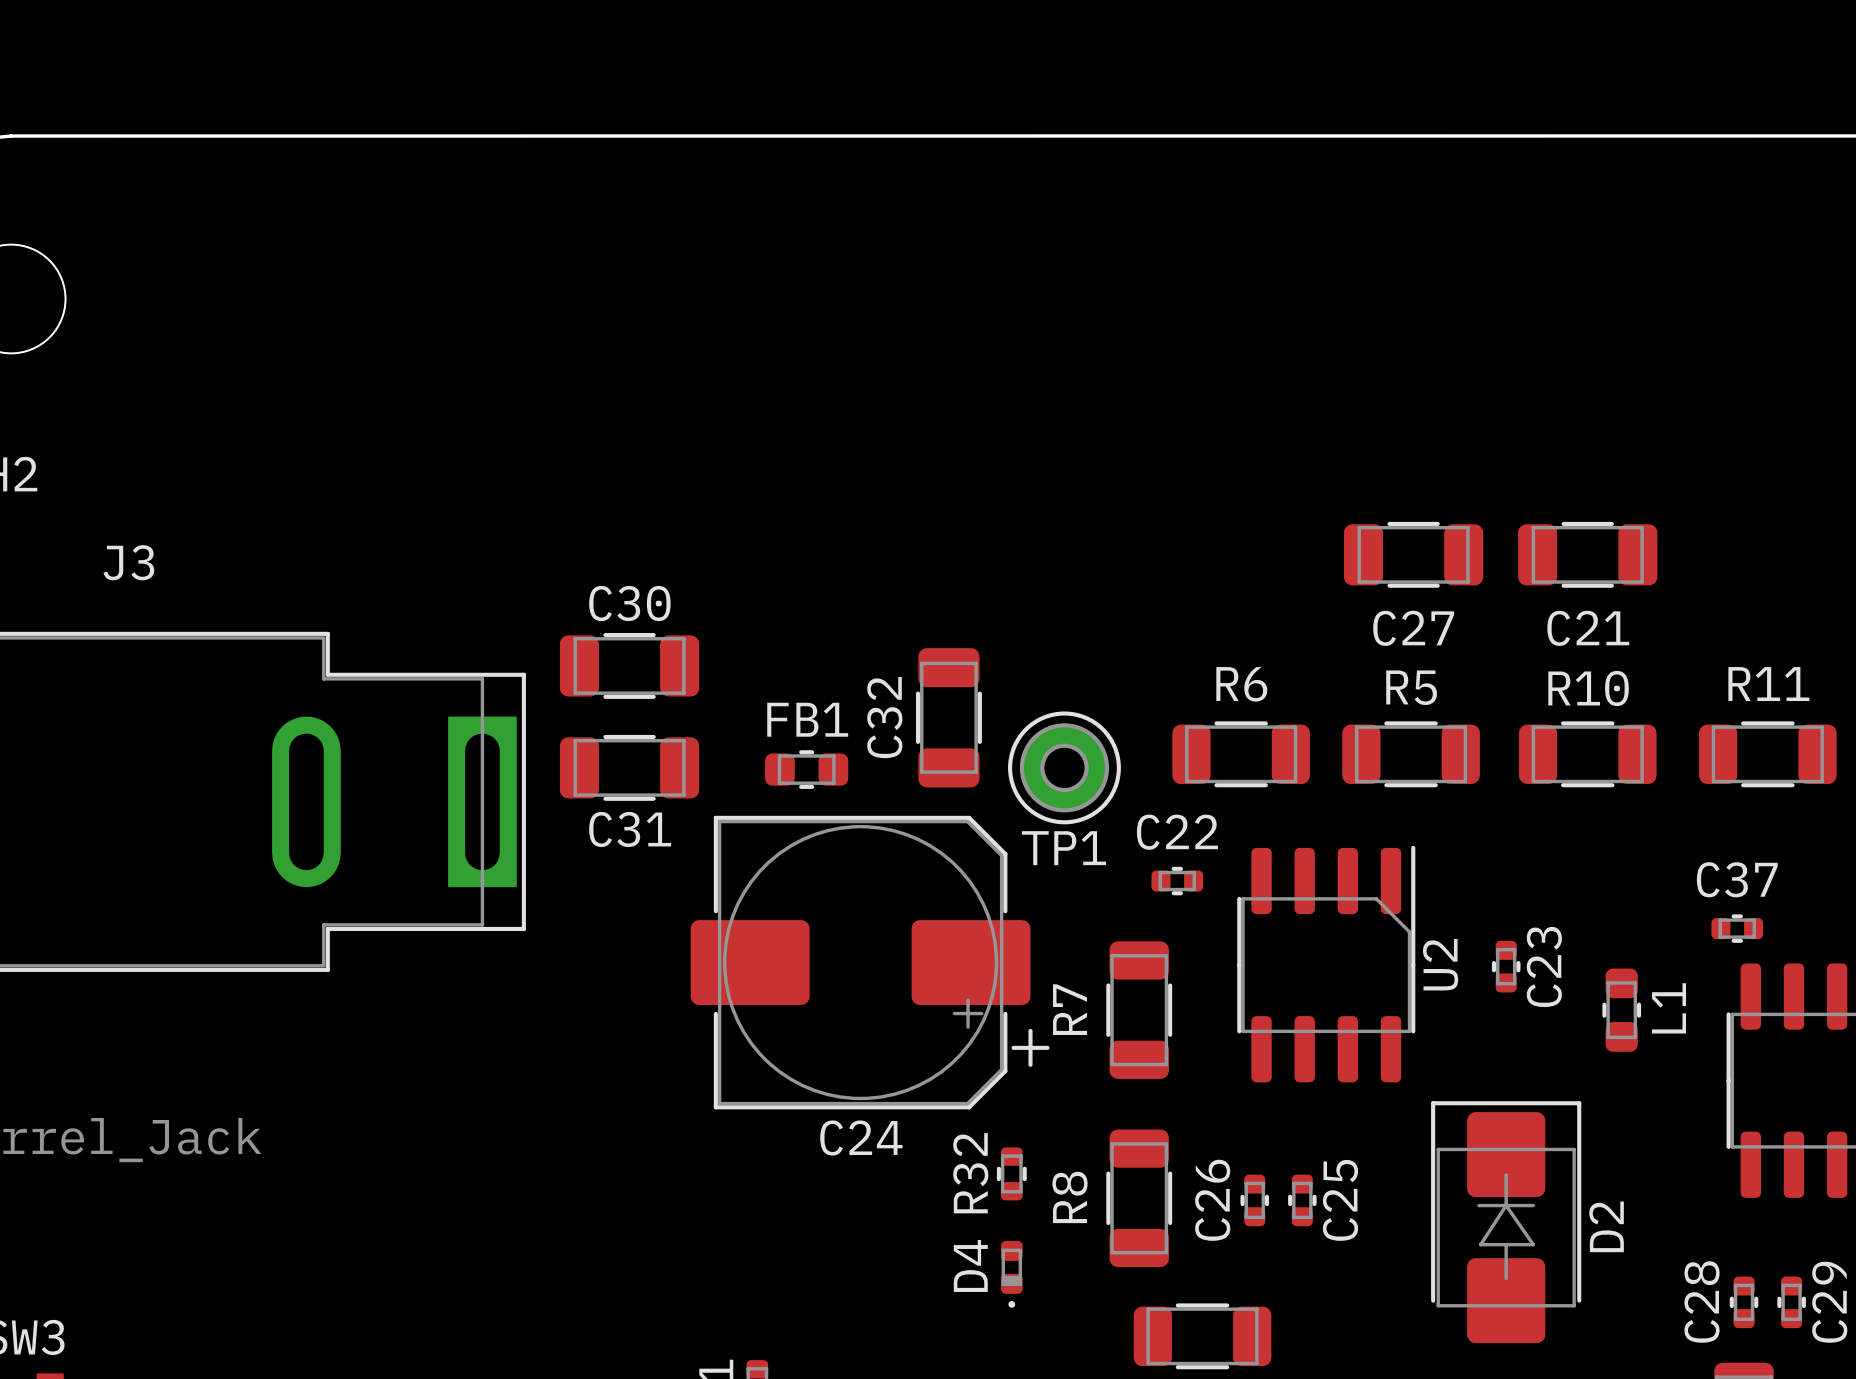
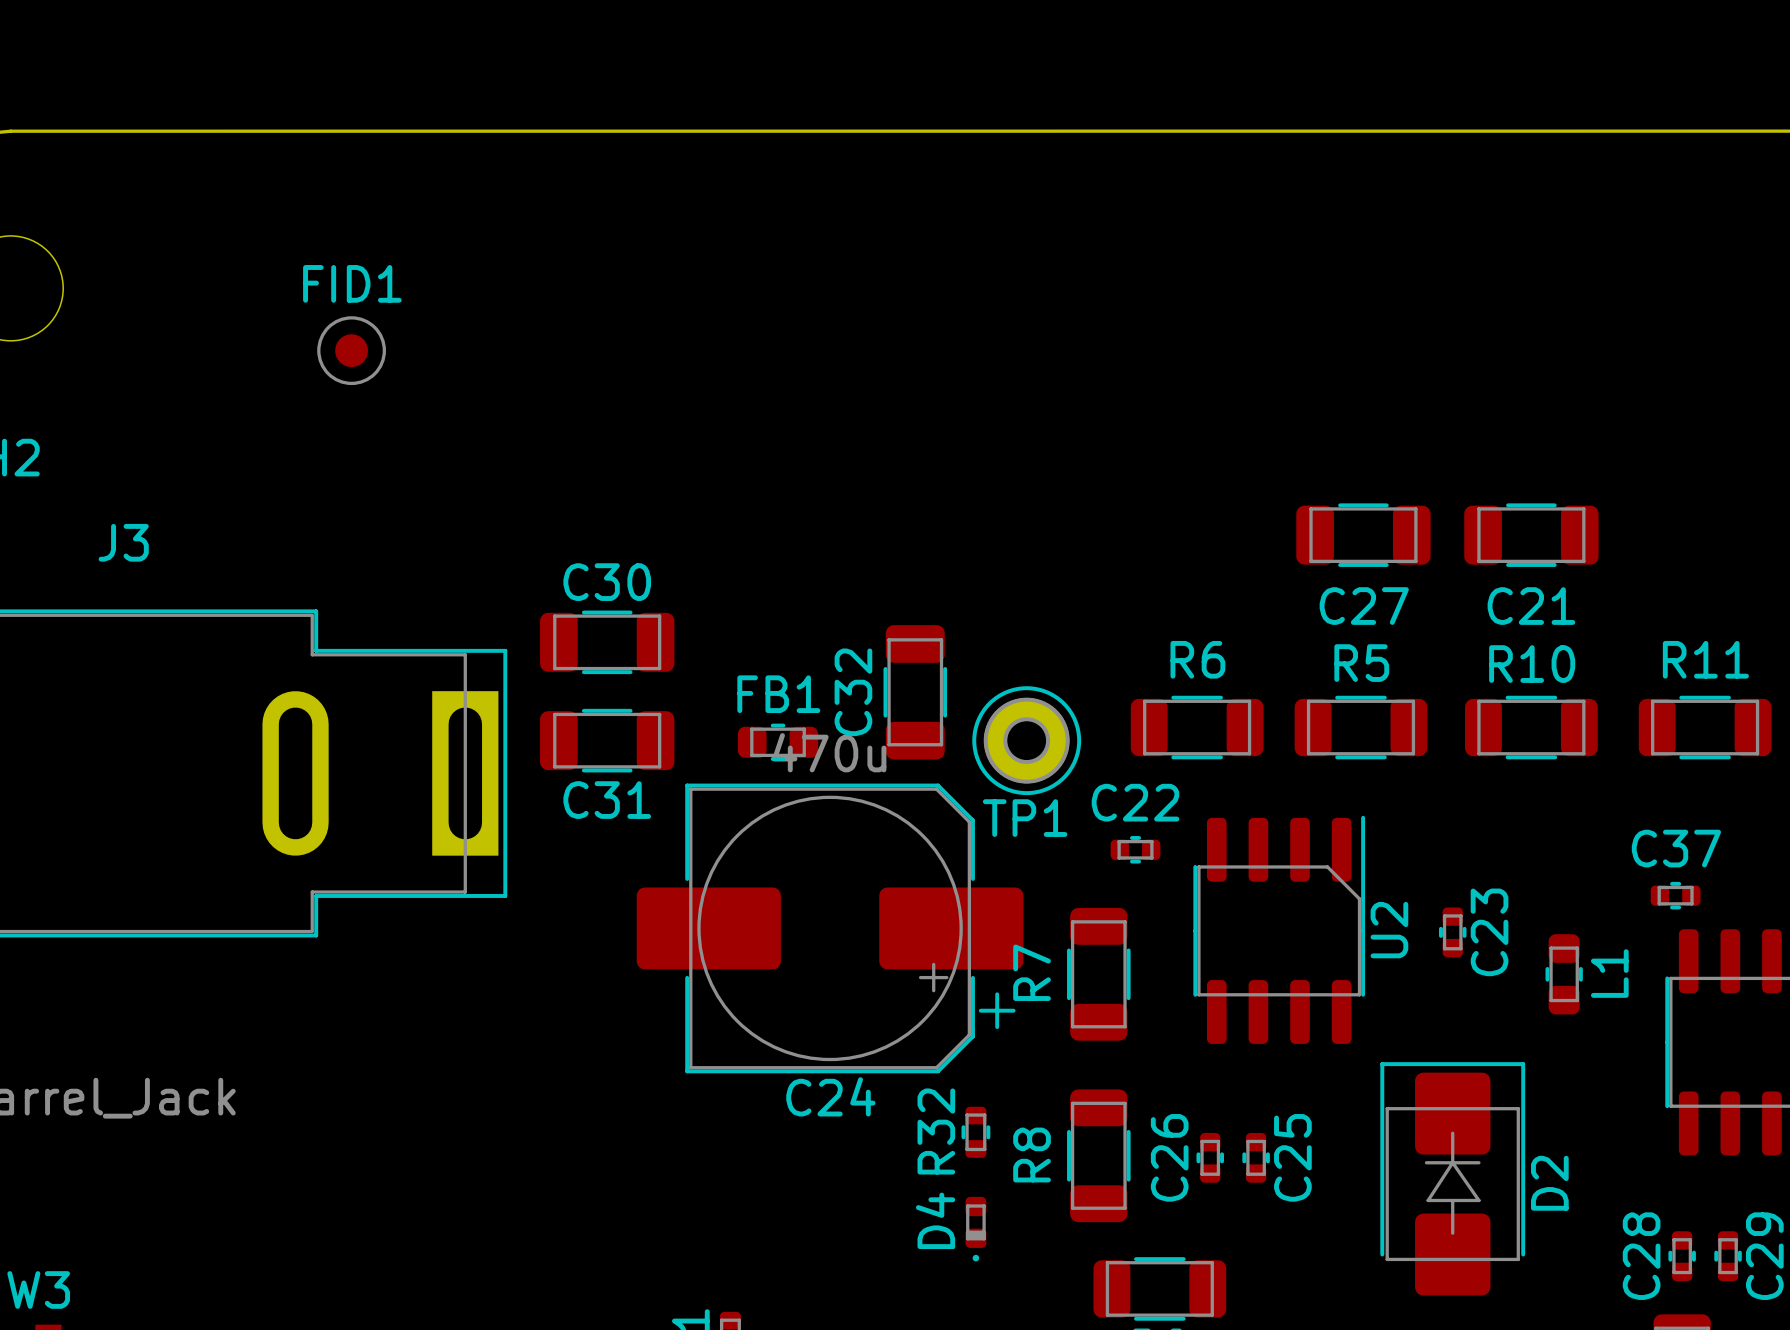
FID1: none -> (351, 350)
C24 value: none -> 470u (829, 752)
C24 footprint: [690, 815, 1050, 1110] -> [636, 783, 1024, 1074]

